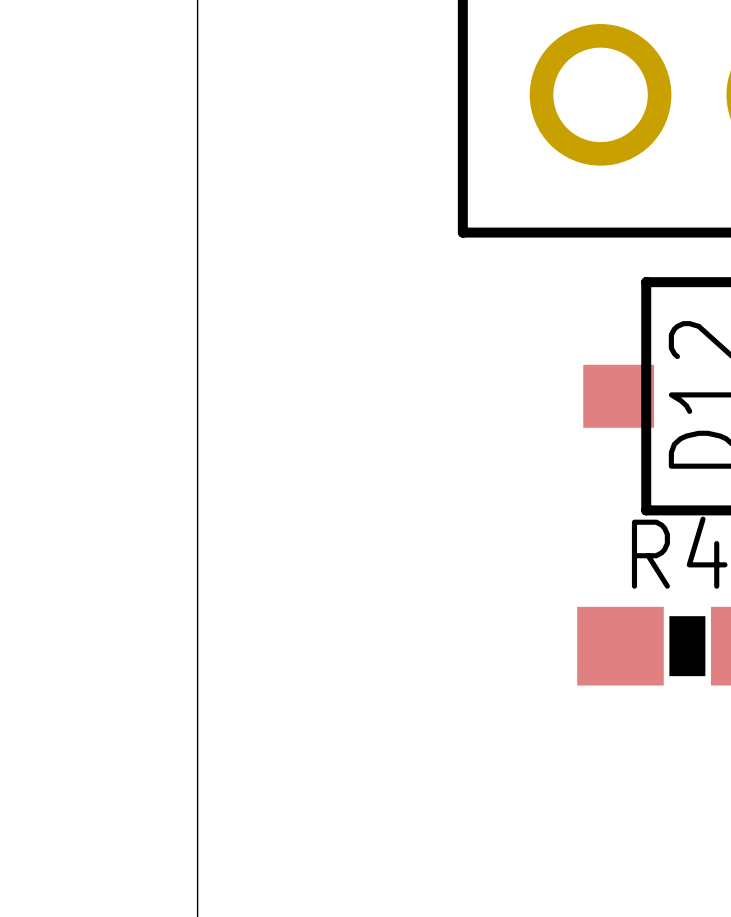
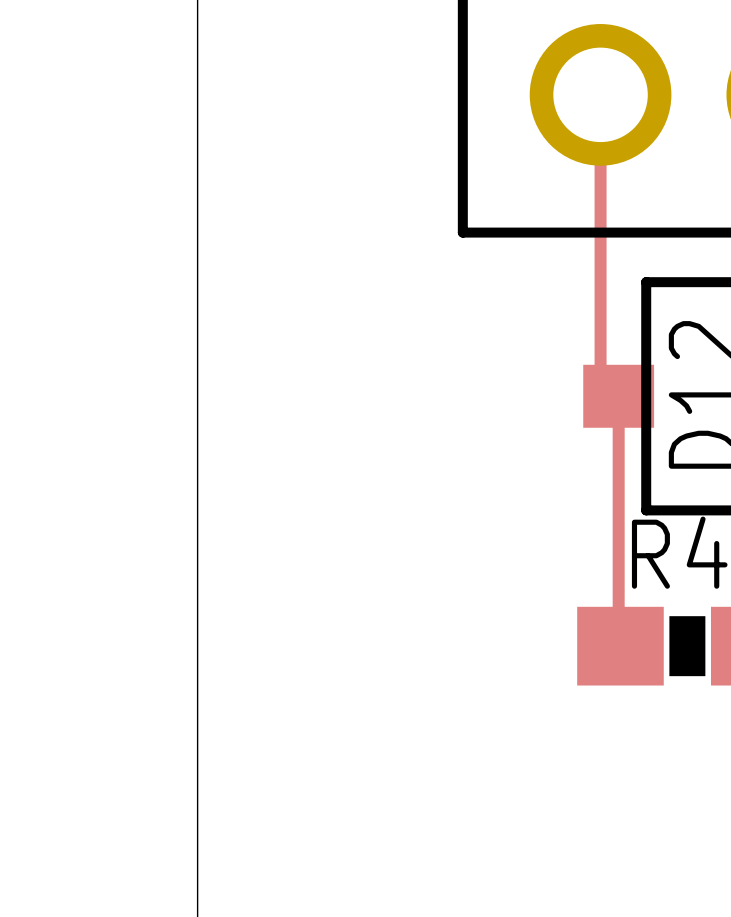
top track: none -> (600, 94) (600, 378) (618, 396) (618, 644) (620, 646)

